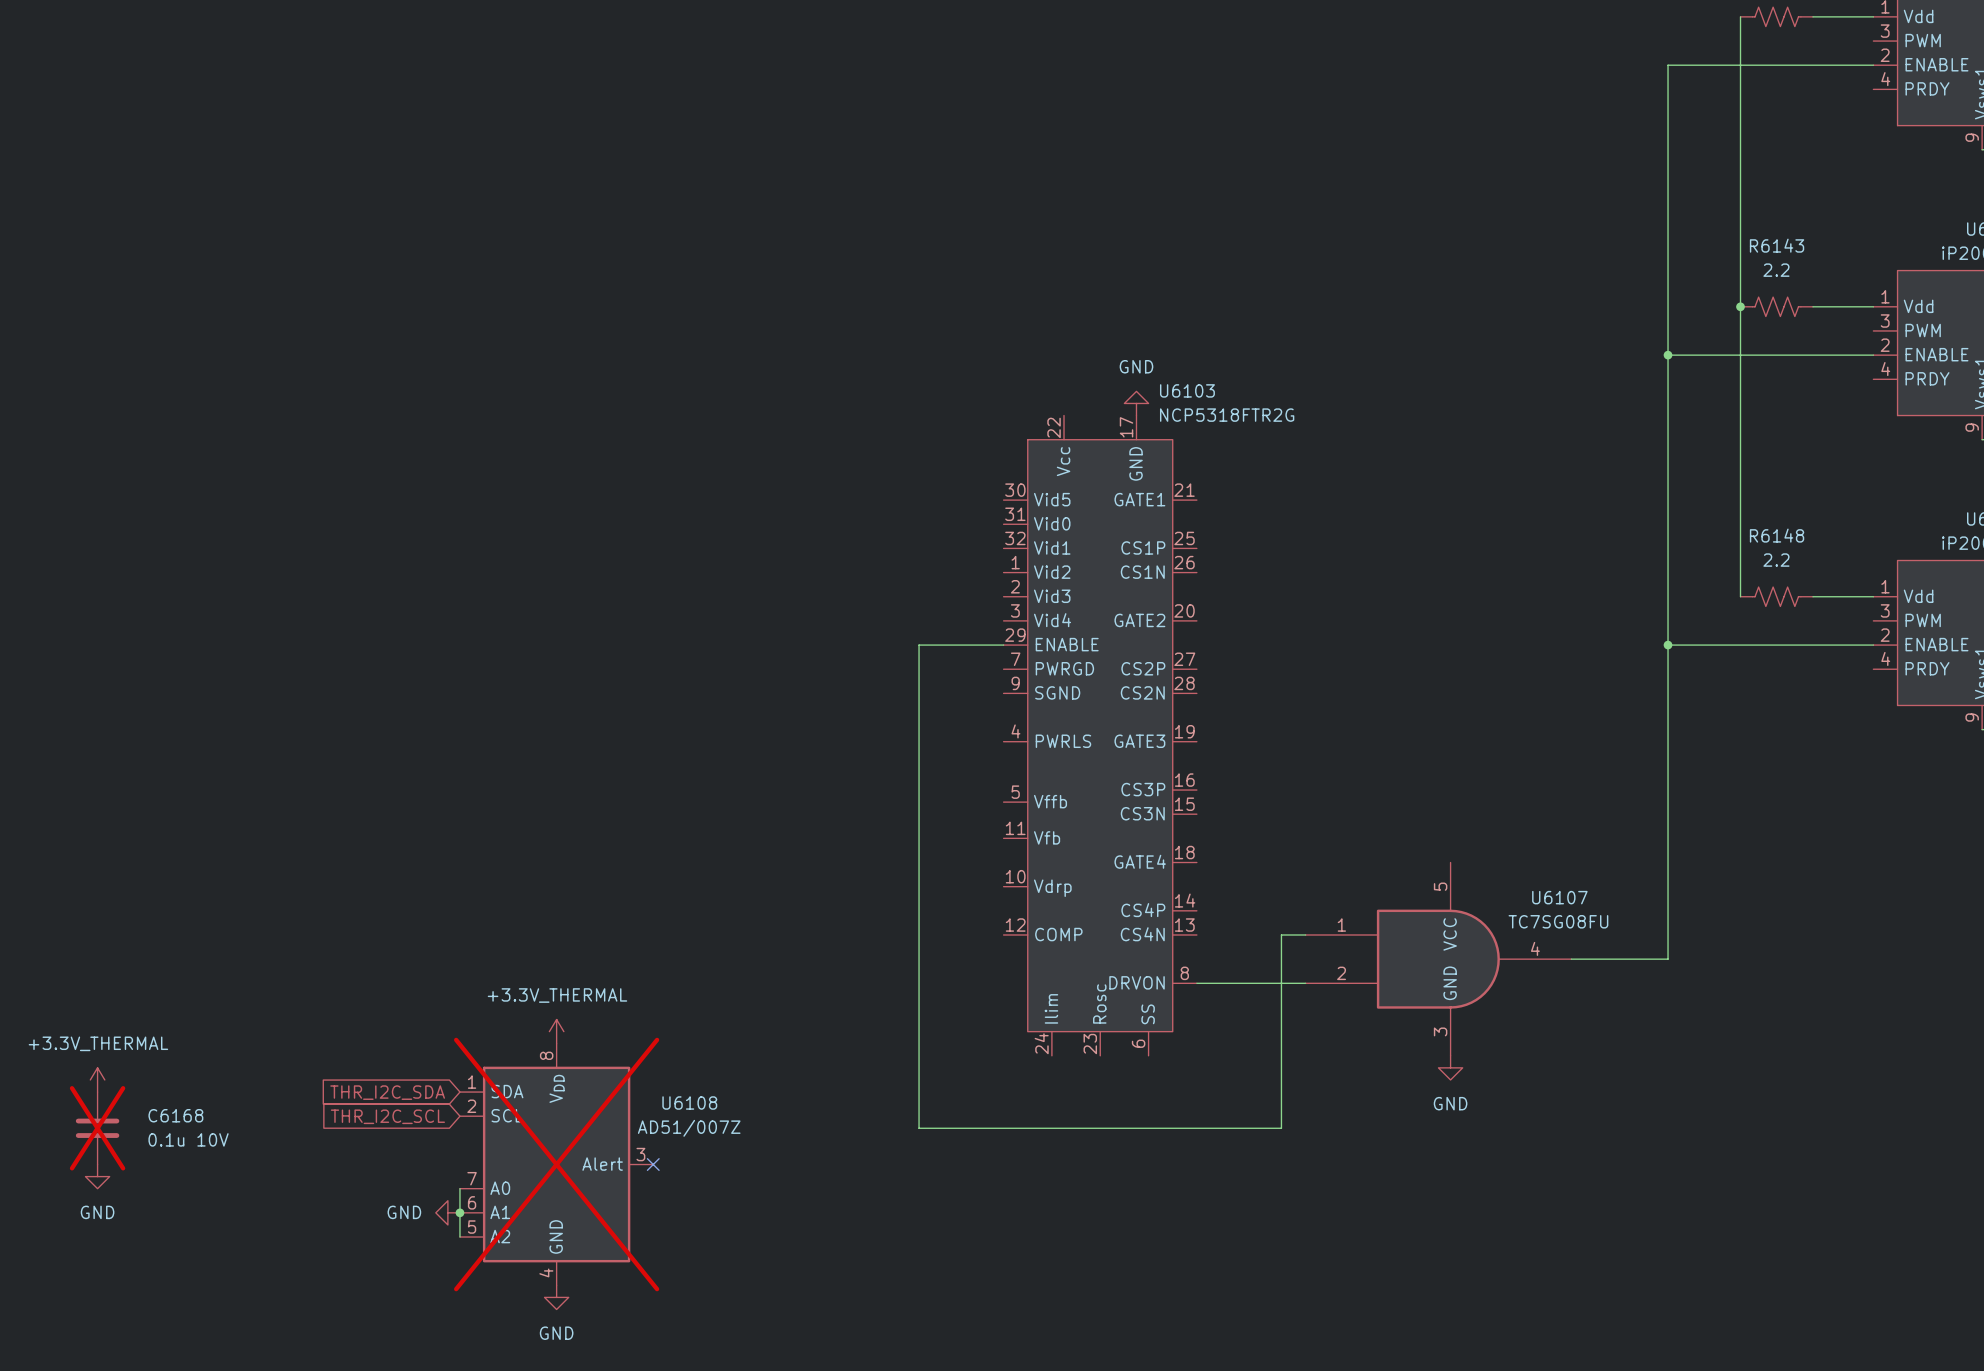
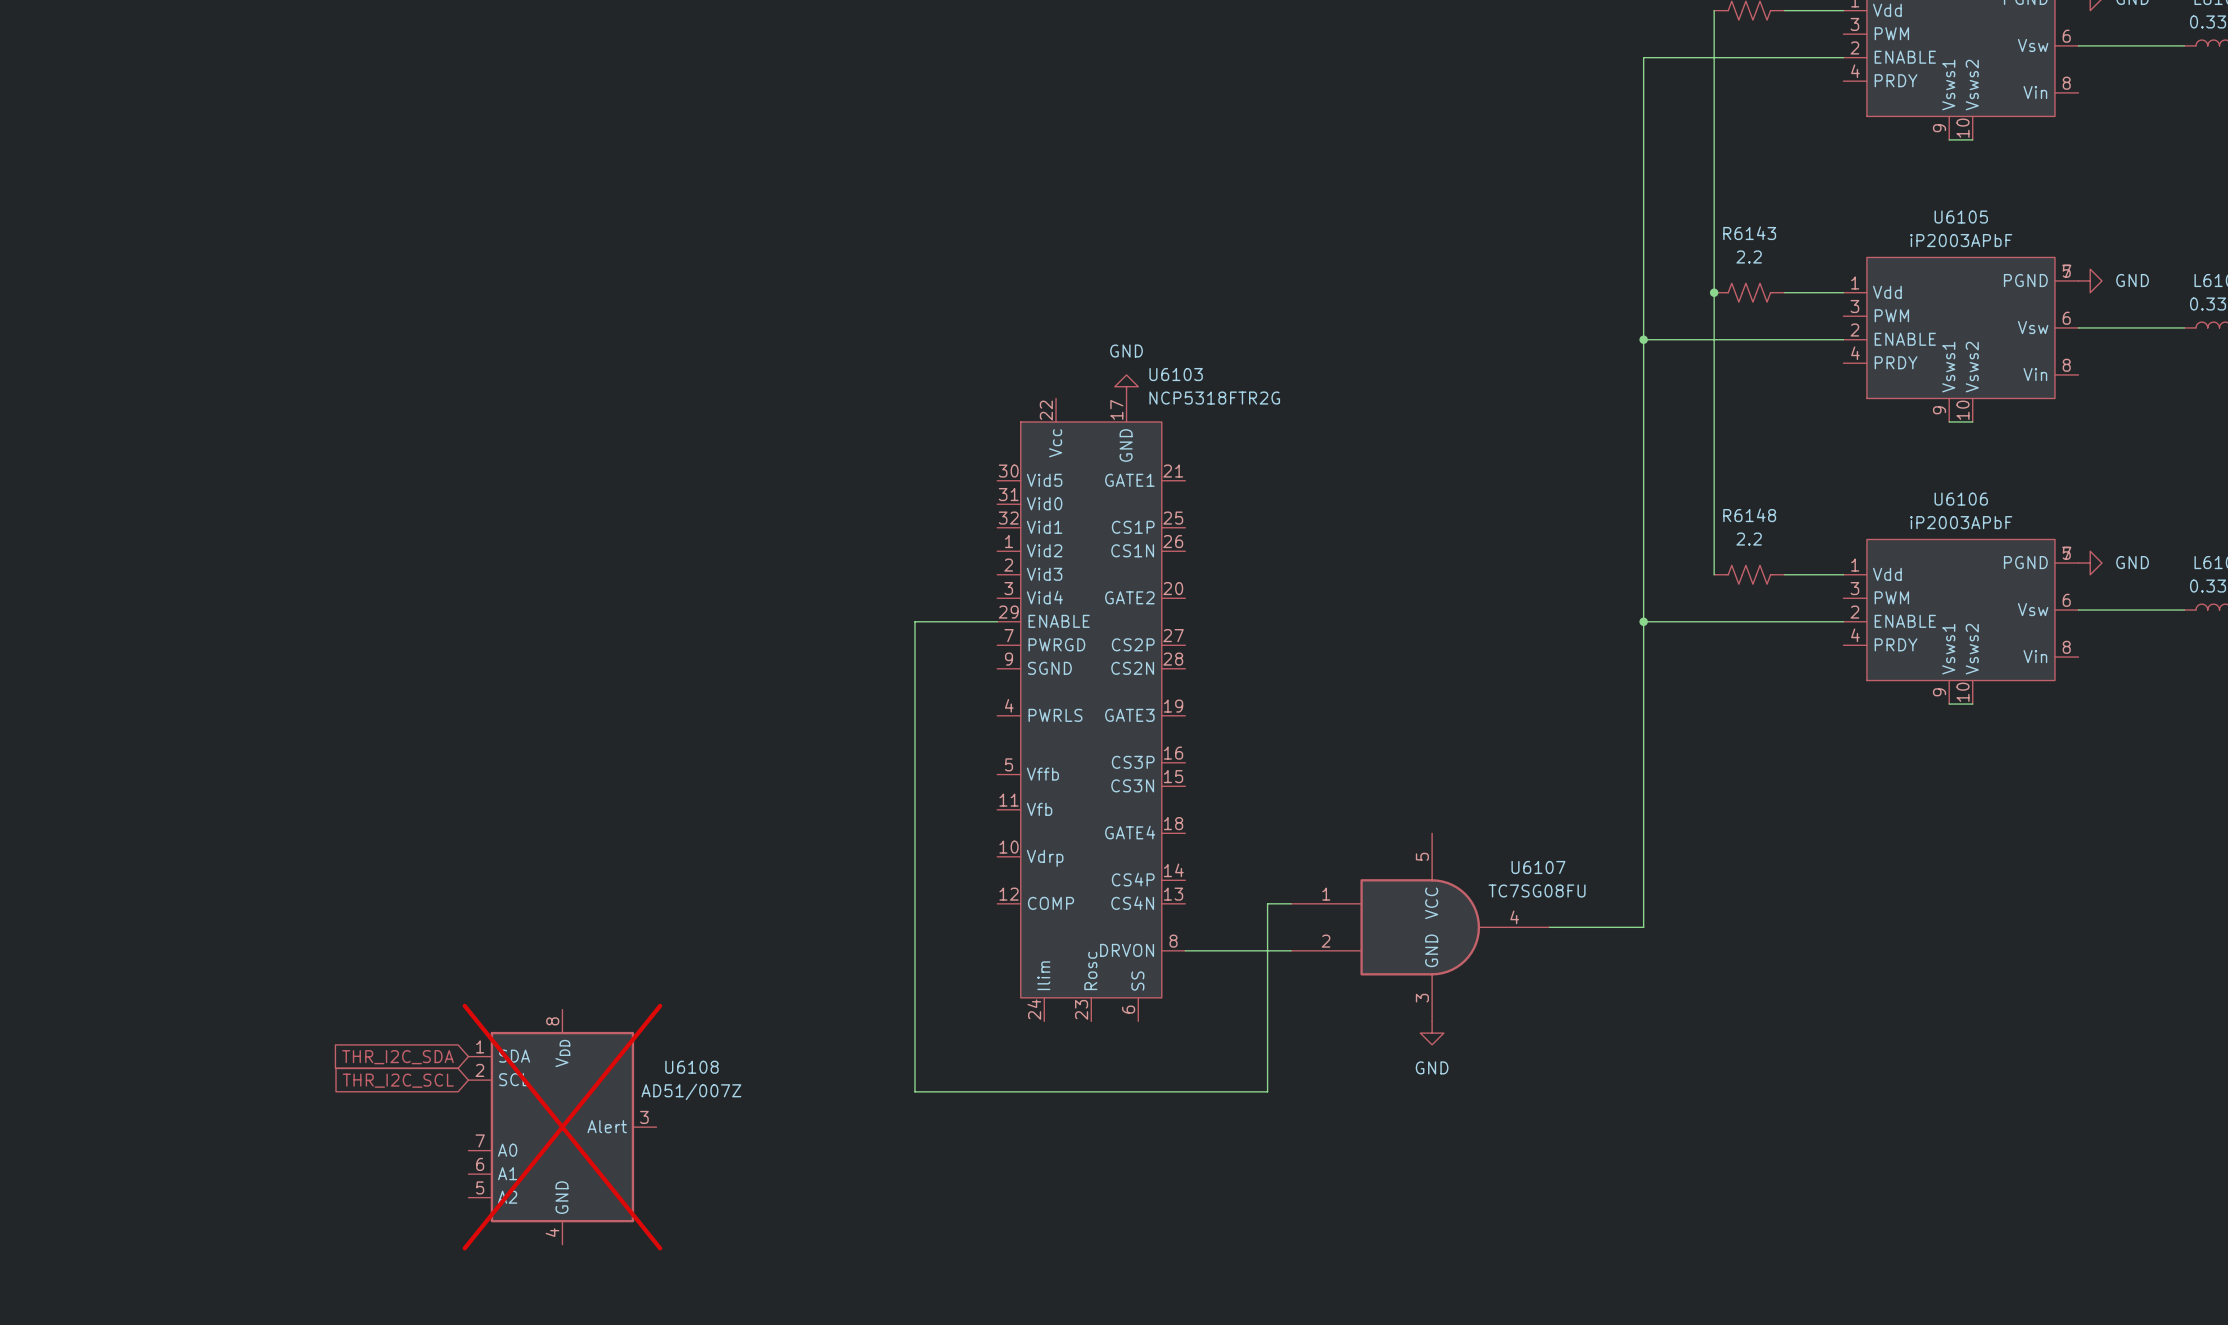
power symbol: +3.3V_THERMAL (556, 1031) -> none
power symbol: +3.3V_THERMAL (97, 1079) -> none
C6168: 0.1u 10V (97, 1128) -> none
no-connect mark: (653, 1164) -> none
power symbol: GND (97, 1176) -> none
wire: (459, 1188) (459, 1237) -> none
power symbol: GND (447, 1212) -> none
junction: (459, 1212) -> none
power symbol: GND (556, 1297) -> none

